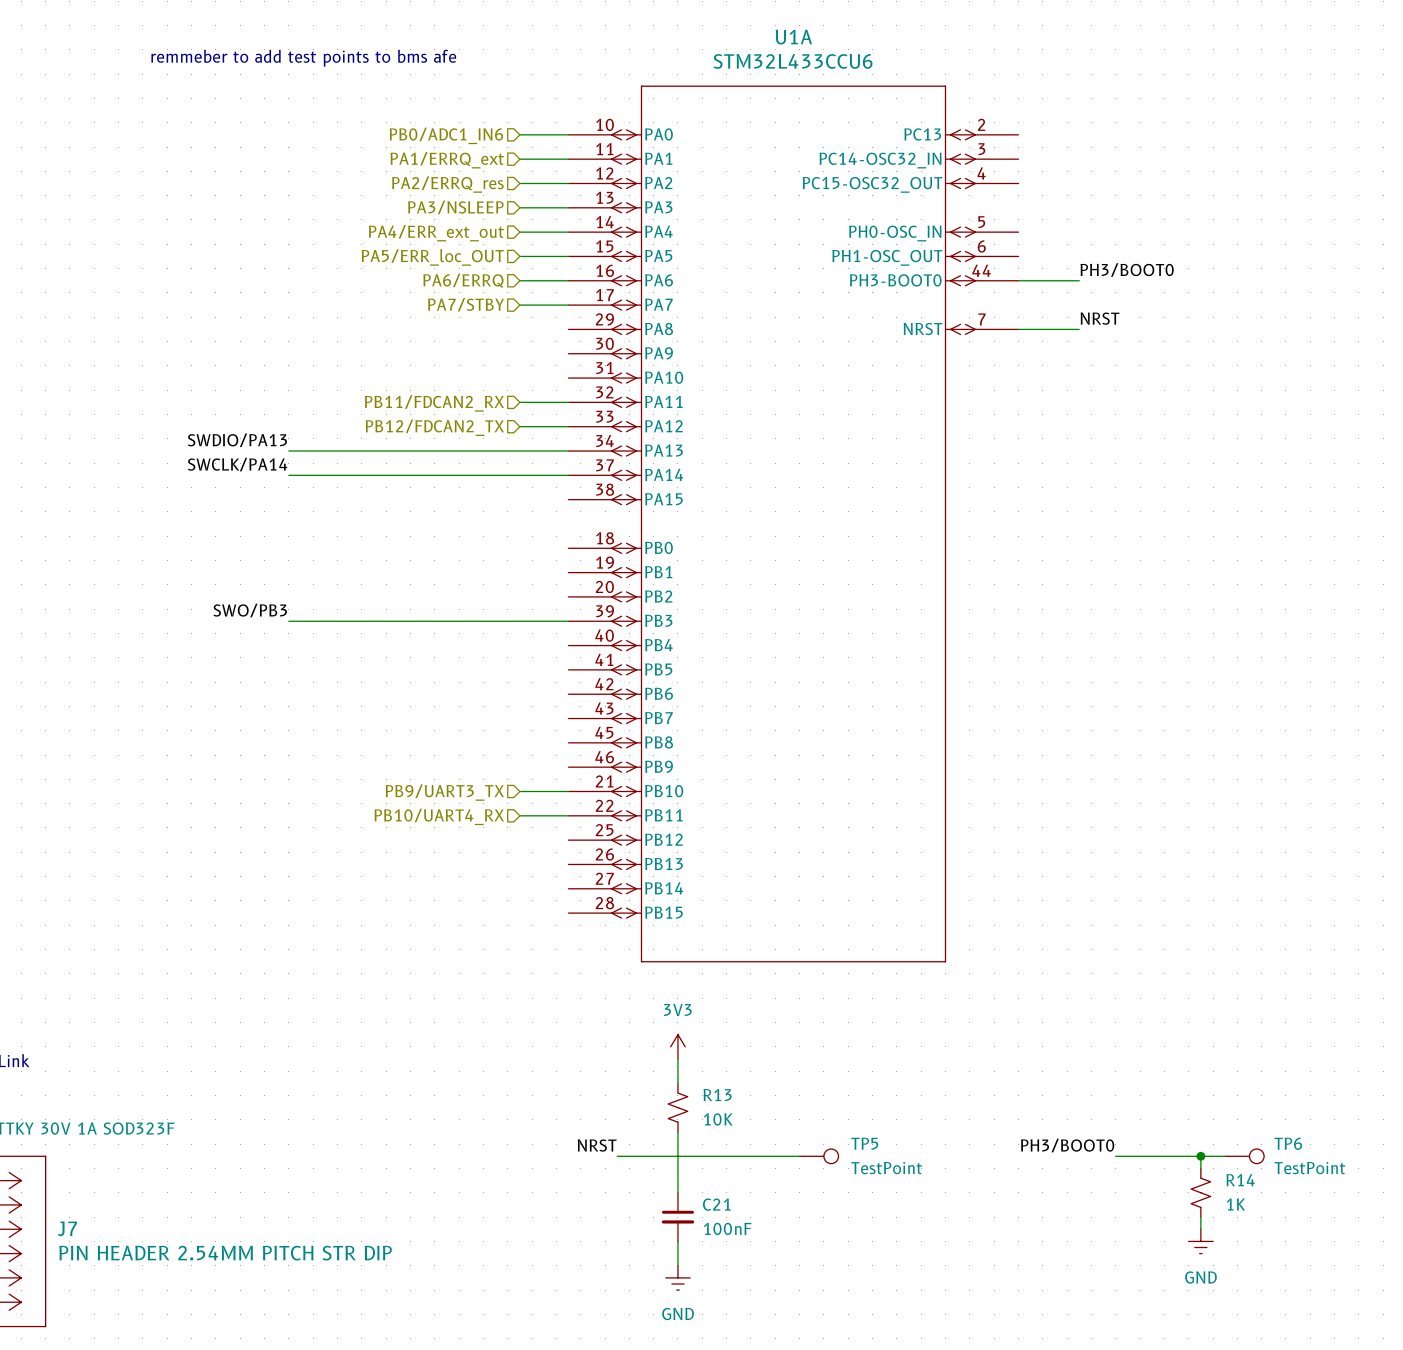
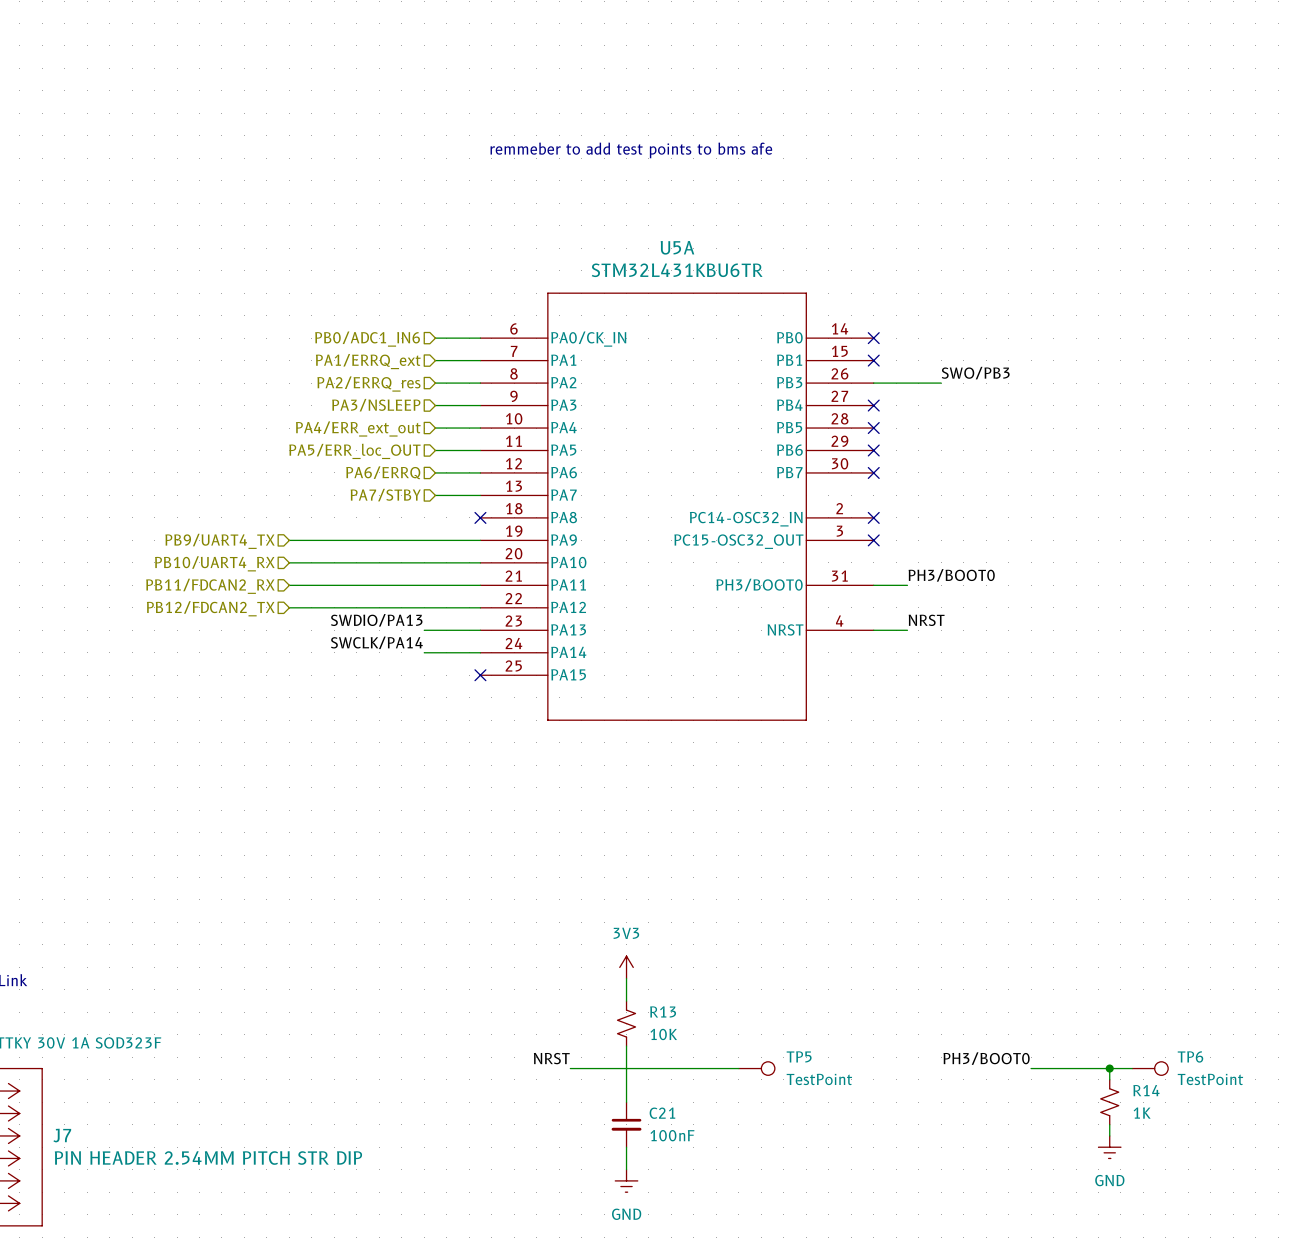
text: remmeber to add test points to bms afe (303, 58) -> none
wire: (519, 134) (568, 134) -> (435, 338) (480, 338)
hierarchical label position: PB0/ADC1_IN6 (446, 135) -> PB0/ADC1_IN6 (367, 339)
wire: (519, 159) (568, 159) -> (435, 360) (480, 360)
hierarchical label position: PA1/ERRQ_ext (447, 160) -> PA1/ERRQ_ext (368, 361)
text: none -> remmeber to add test points to bms afe (631, 150)
wire: (519, 183) (568, 183) -> (435, 383) (480, 383)
hierarchical label position: PA2/ERRQ_res (447, 184) -> PA2/ERRQ_res (368, 384)
hierarchical label position: PA3/NSLEEP (455, 207) -> PA3/NSLEEP (376, 405)
wire: (519, 207) (568, 207) -> (435, 405) (480, 405)
wire: (519, 232) (568, 232) -> (435, 428) (480, 428)
hierarchical label position: PA4/ERR_ext_out (436, 233) -> PA4/ERR_ext_out (358, 428)
wire: (519, 256) (568, 256) -> (435, 450) (480, 450)
hierarchical label position: PA5/ERR_loc_OUT (432, 257) -> PA5/ERR_loc_OUT (354, 451)
label: PH3/BOOT0 (1127, 270) -> none
hierarchical label position: PA6/ERRQ (463, 280) -> PA6/ERRQ (383, 472)
wire: (519, 280) (568, 280) -> (435, 472) (480, 472)
wire: (1018, 280) (1079, 280) -> none
hierarchical label position: PA7/STBY (466, 304) -> PA7/STBY (385, 495)
wire: (519, 305) (568, 305) -> (435, 495) (480, 495)
label: NRST (1100, 318) -> none
wire: (1018, 329) (1079, 329) -> none
no-connect mark: none -> (873, 338)
no-connect mark: none -> (873, 360)
wire: (519, 402) (568, 402) -> none
hierarchical label: PB11/FDCAN2_RX (434, 403) -> none
label: none -> SWO/PB3 (975, 373)
wire: none -> (873, 383) (941, 383)
wire: (519, 426) (568, 426) -> none
hierarchical label: PB12/FDCAN2_TX (434, 427) -> none
no-connect mark: none -> (873, 405)
label: SWDIO/PA13 (237, 440) -> none
wire: (288, 451) (568, 451) -> none
no-connect mark: none -> (873, 428)
label: SWCLK/PA14 (237, 464) -> none
wire: (288, 475) (568, 475) -> none
no-connect mark: none -> (873, 450)
no-connect mark: none -> (873, 472)
U1A: STM32L433CCU6 (793, 523) -> none
U5A: none -> STM32L431KBU6TR (677, 506)
no-connect mark: none -> (480, 517)
no-connect mark: none -> (873, 517)
wire: none -> (289, 540) (480, 540)
no-connect mark: none -> (873, 540)
hierarchical label: none -> PB9/UART4_TX (220, 541)
wire: none -> (289, 562) (480, 562)
hierarchical label: none -> PB10/UART4_RX (214, 563)
label: SWO/PB3 (250, 610) -> none
wire: (288, 621) (568, 621) -> none
label: none -> PH3/BOOT0 (951, 575)
wire: none -> (289, 585) (480, 585)
wire: none -> (873, 585) (907, 585)
hierarchical label: none -> PB11/FDCAN2_RX (210, 586)
wire: none -> (289, 607) (480, 607)
hierarchical label: none -> PB12/FDCAN2_TX (210, 608)
label: none -> SWDIO/PA13 (376, 620)
label: none -> NRST (926, 620)
wire: none -> (424, 630) (480, 630)
wire: none -> (873, 630) (907, 630)
label: none -> SWCLK/PA14 (376, 642)
wire: none -> (424, 652) (480, 652)
no-connect mark: none -> (480, 675)
wire: (519, 791) (568, 791) -> none
hierarchical label: PB9/UART3_TX (444, 792) -> none
wire: (519, 815) (568, 815) -> none
hierarchical label: PB10/UART4_RX (439, 816) -> none

